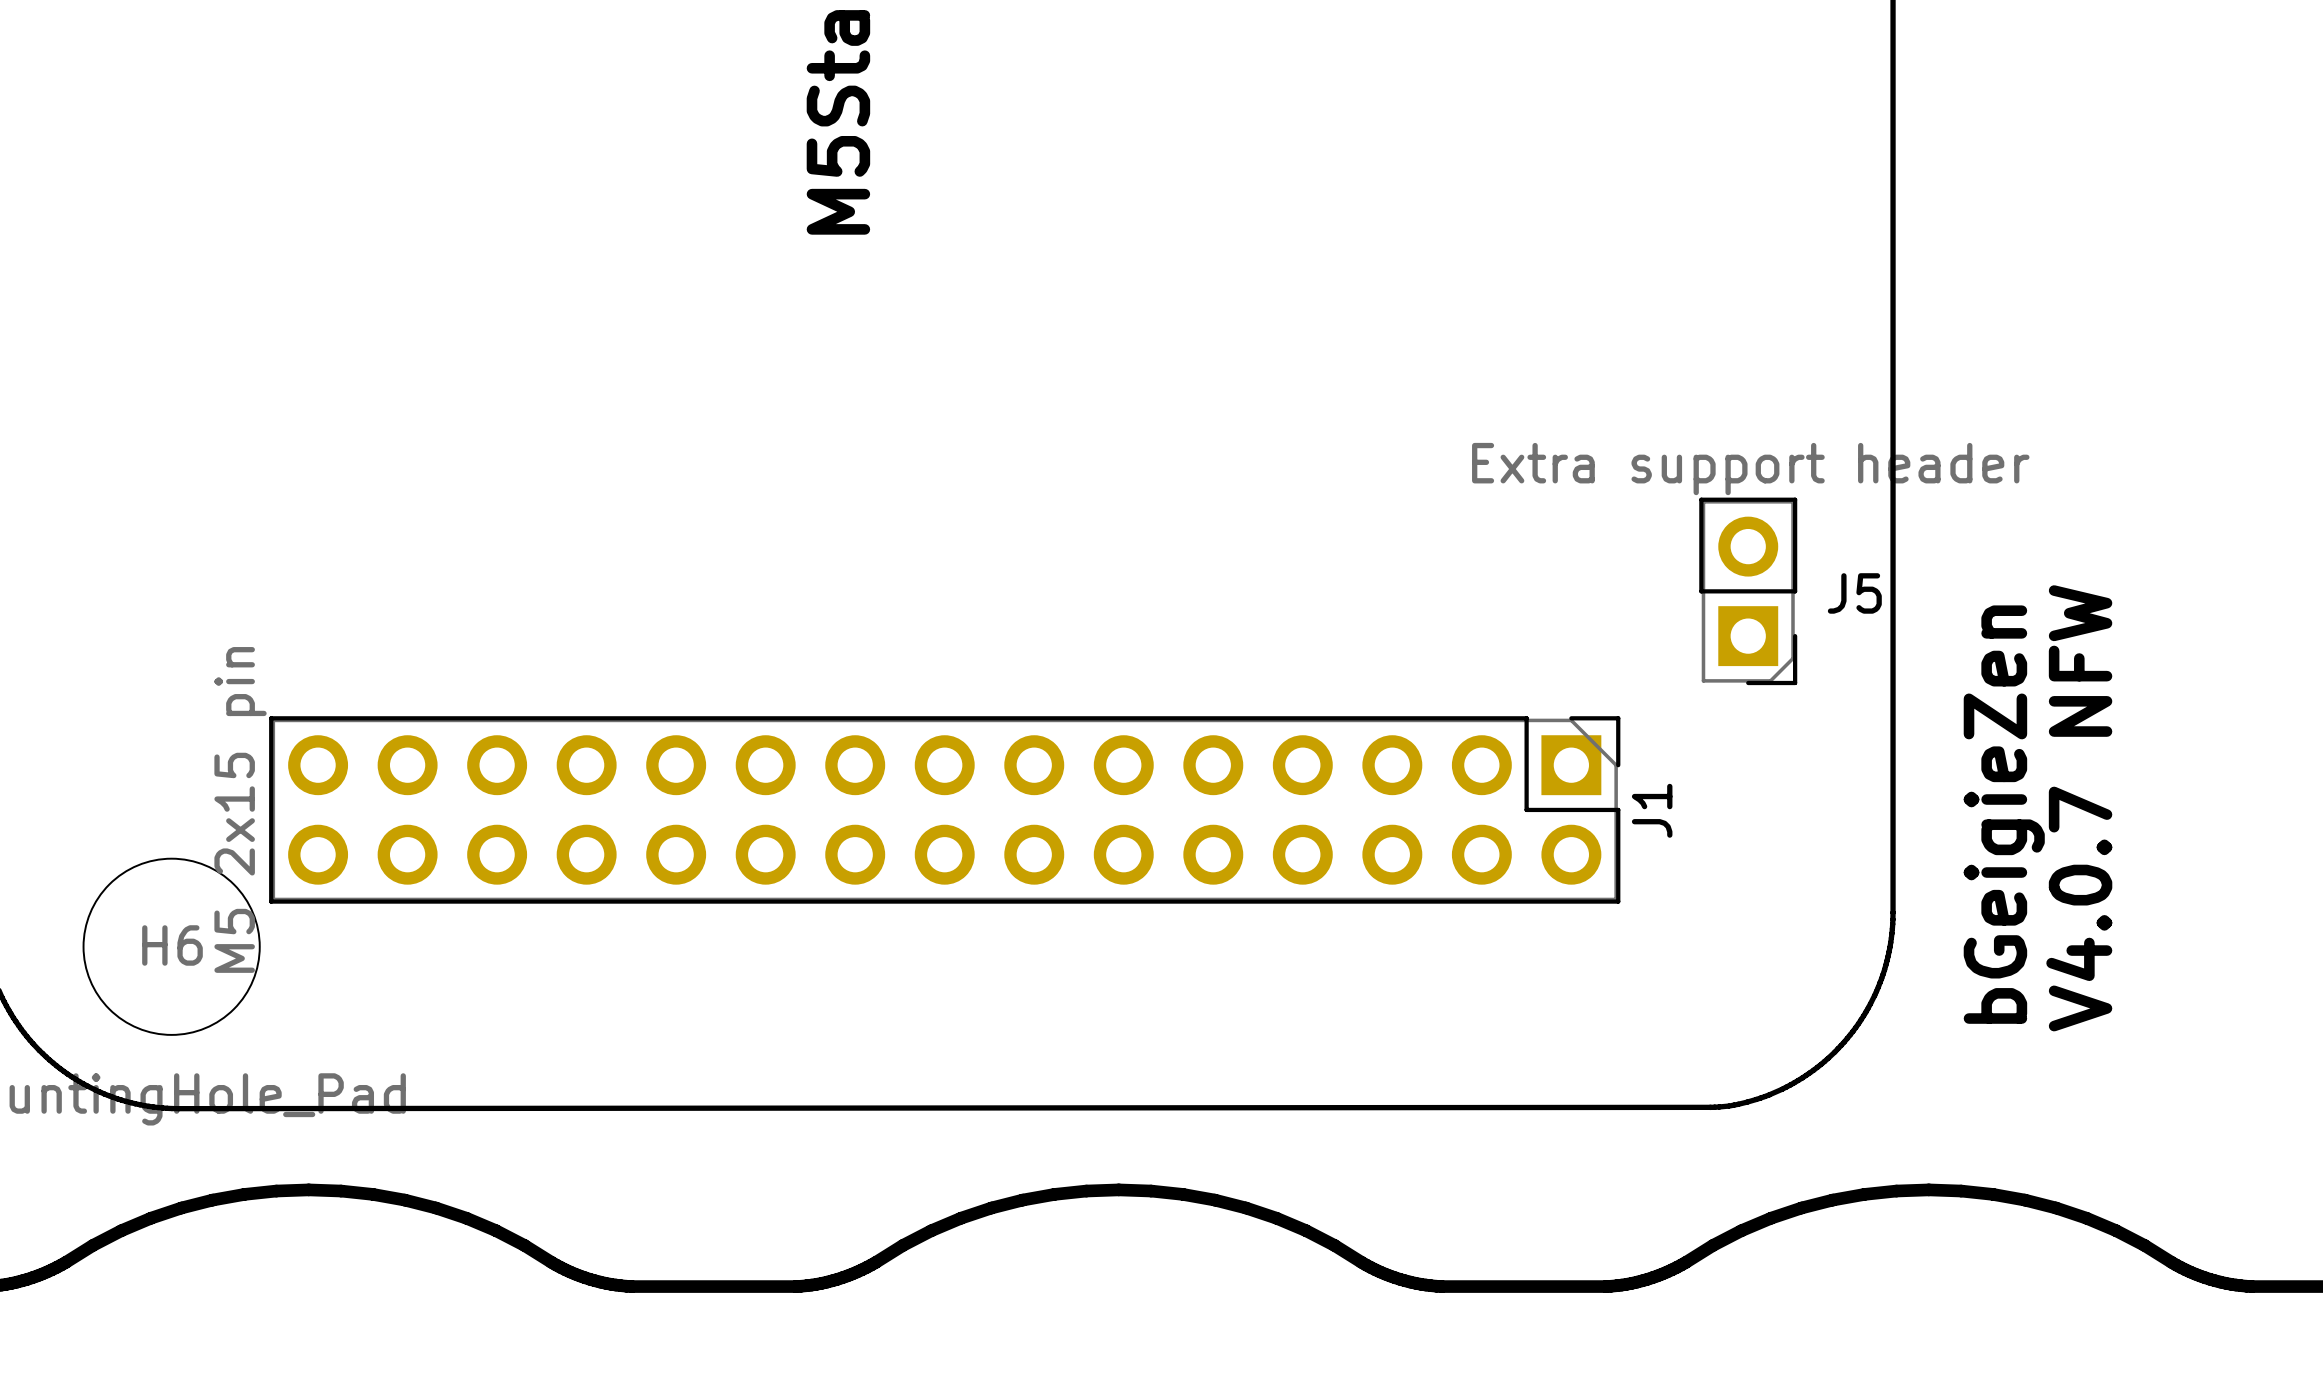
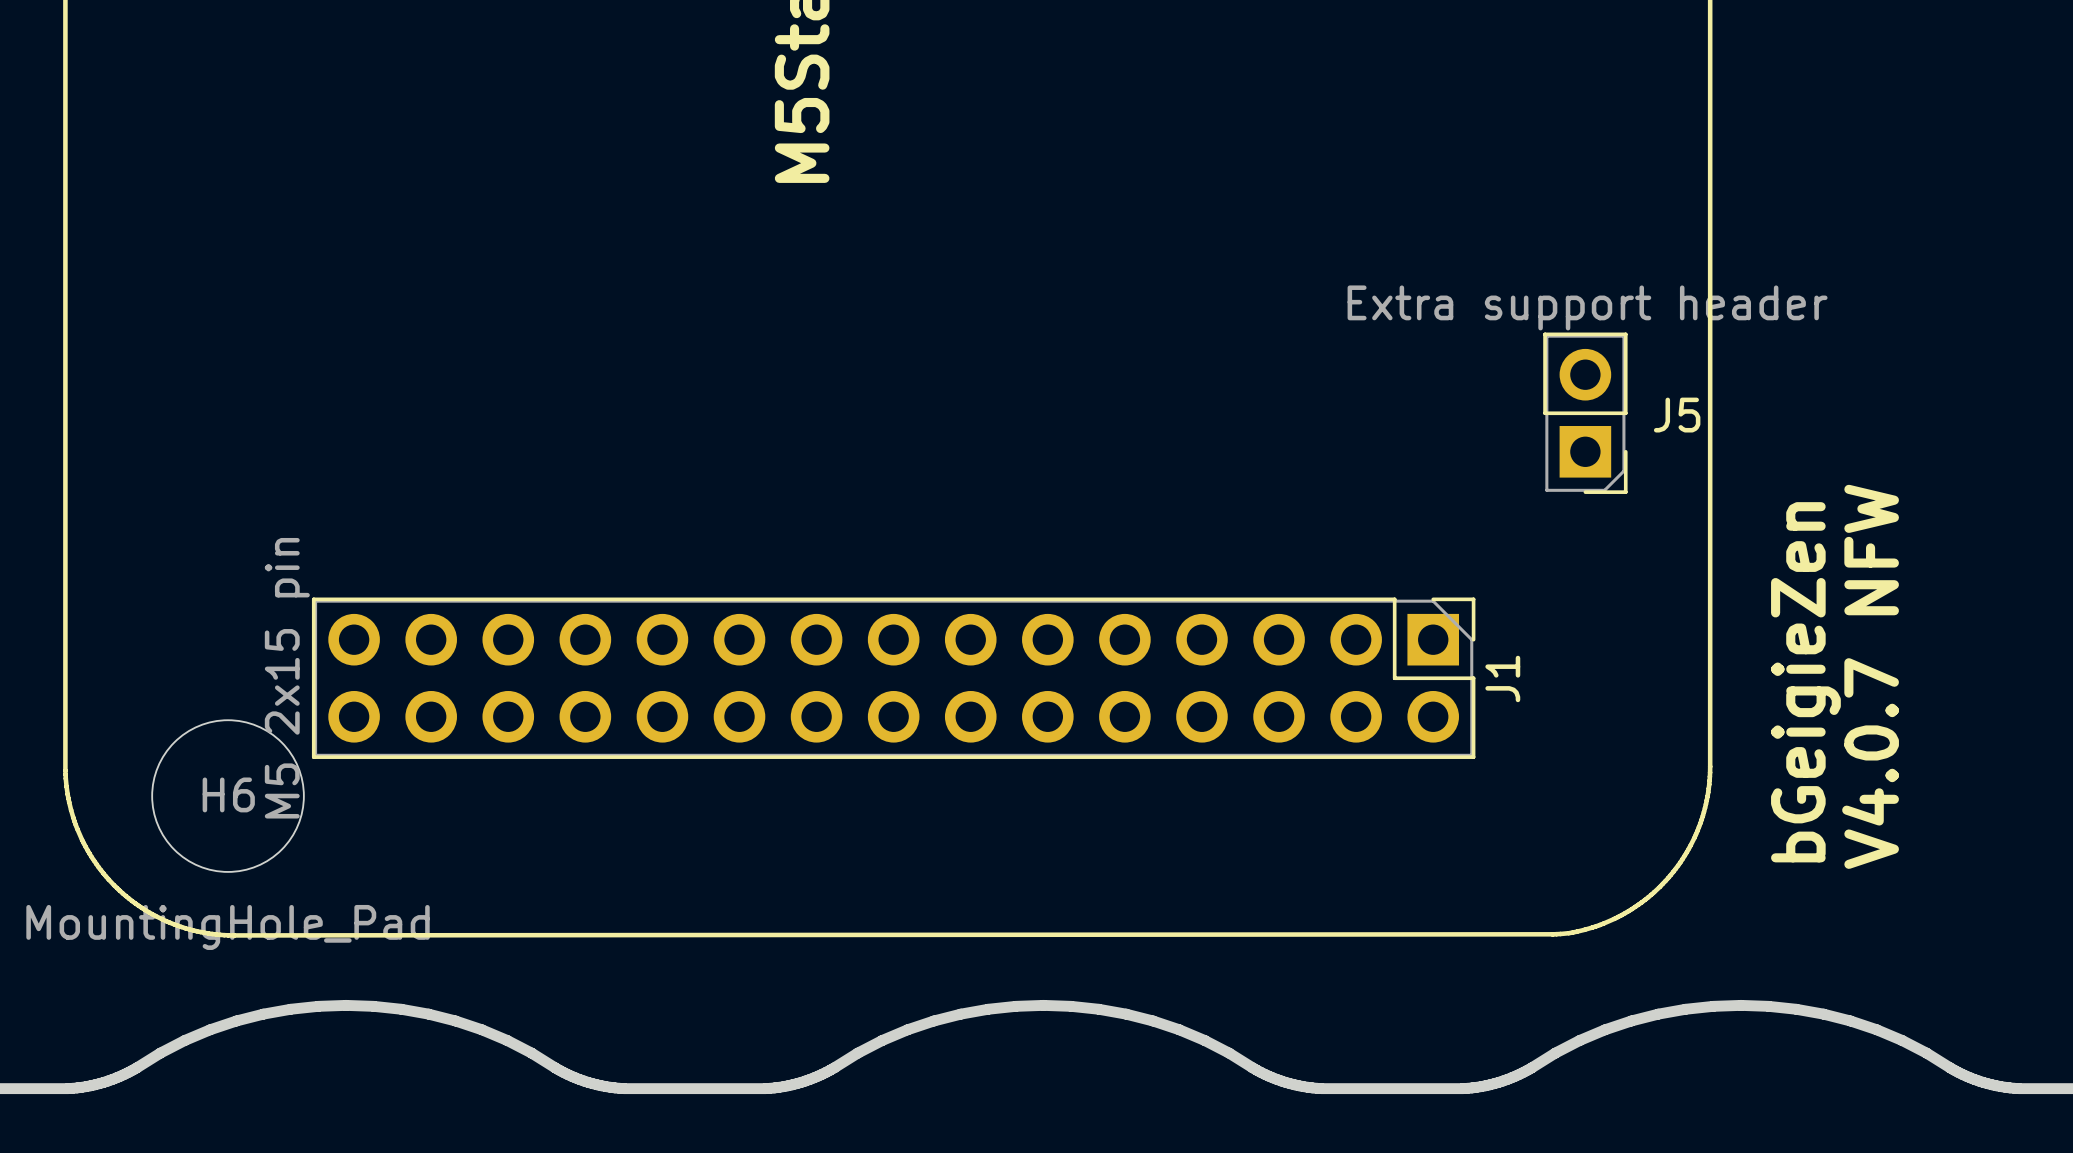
J5 position: (1748, 591) -> (1585, 413)

